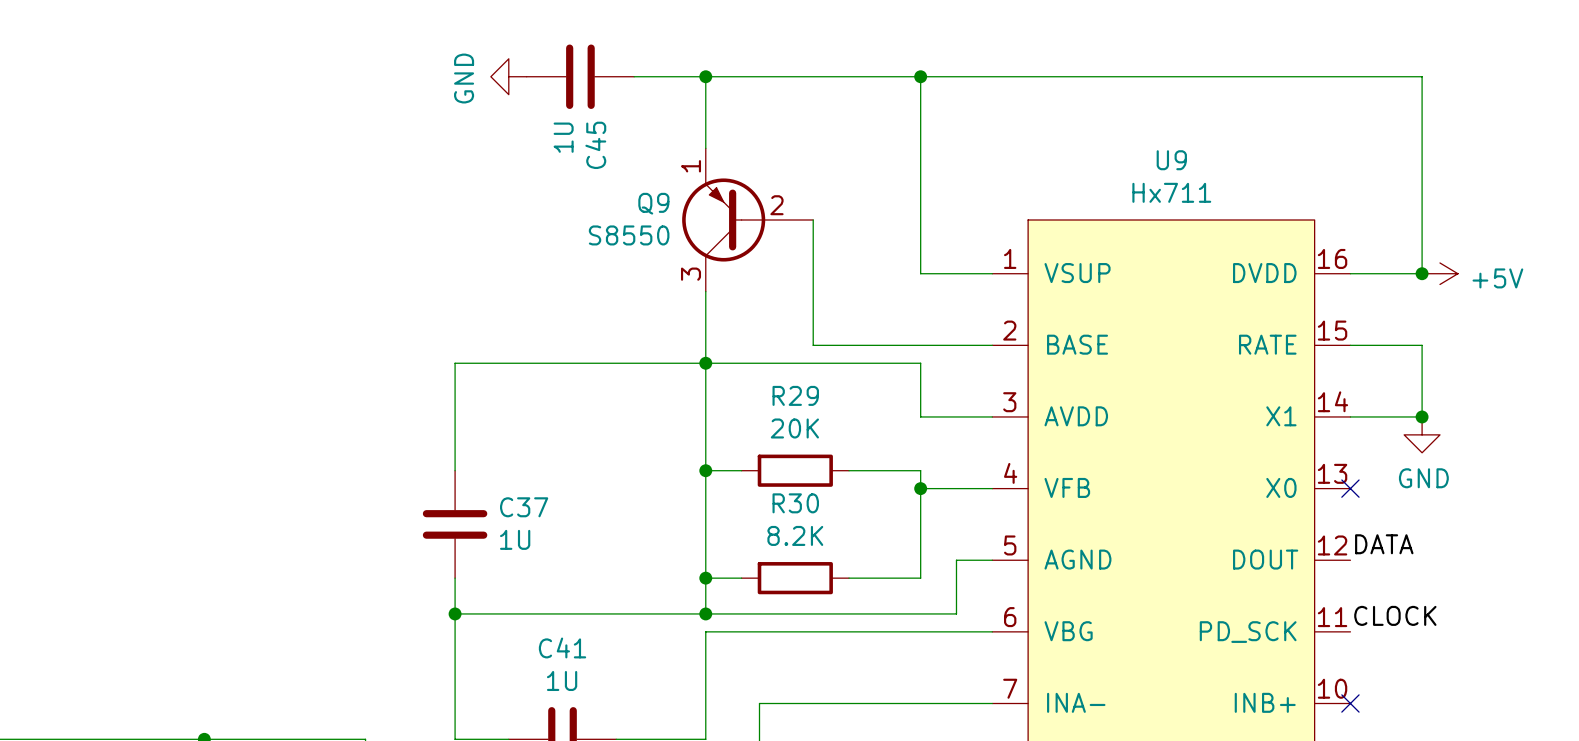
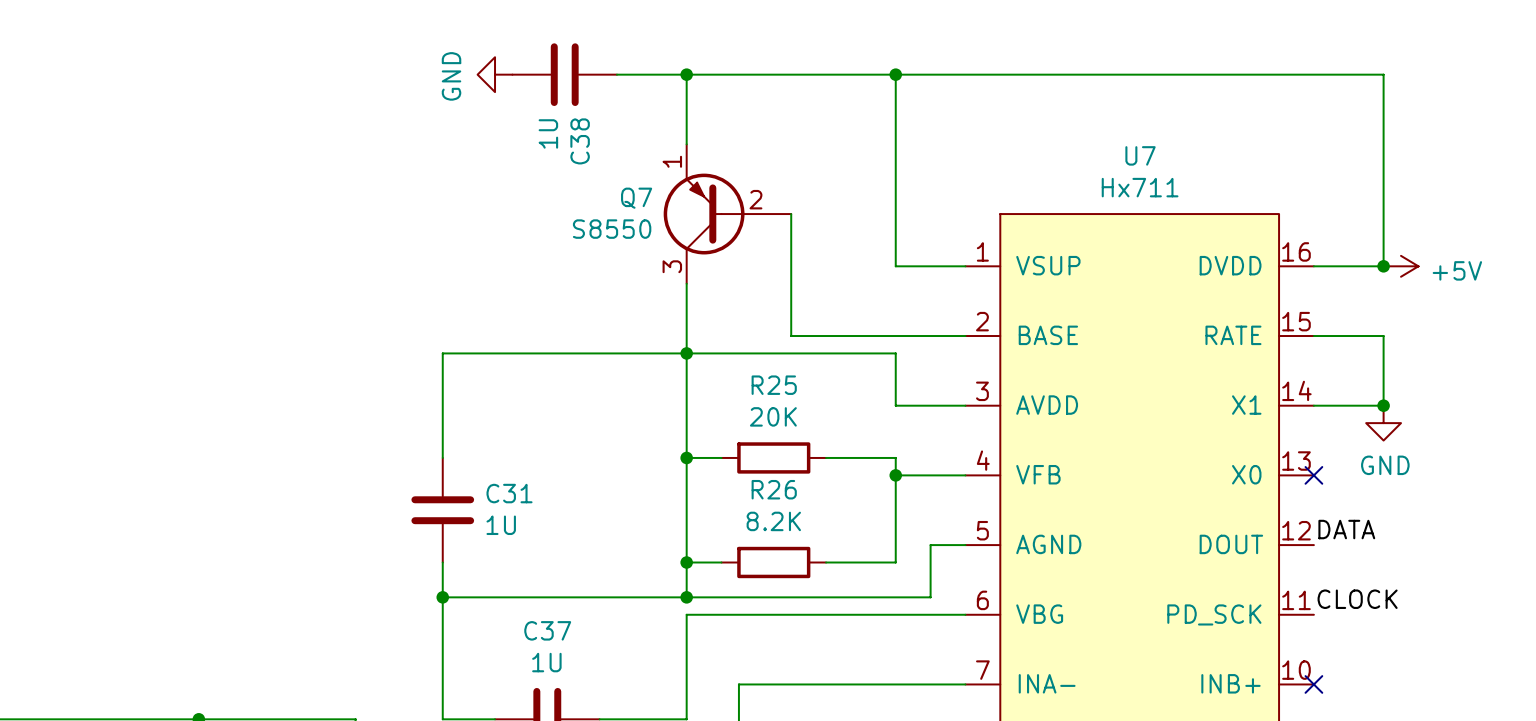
C45 name: C45 (595, 145) -> C38 (580, 141)
U9 name: U9 (1171, 160) -> U7 (1140, 155)
Q9 name: Q9 (653, 203) -> Q7 (636, 198)
R29 name: R29 (795, 395) -> R25 (774, 385)
R30 name: R30 (795, 503) -> R26 (774, 489)
C37 name: C37 (524, 507) -> C31 (509, 493)
C41 name: C41 (562, 647) -> C37 (547, 630)

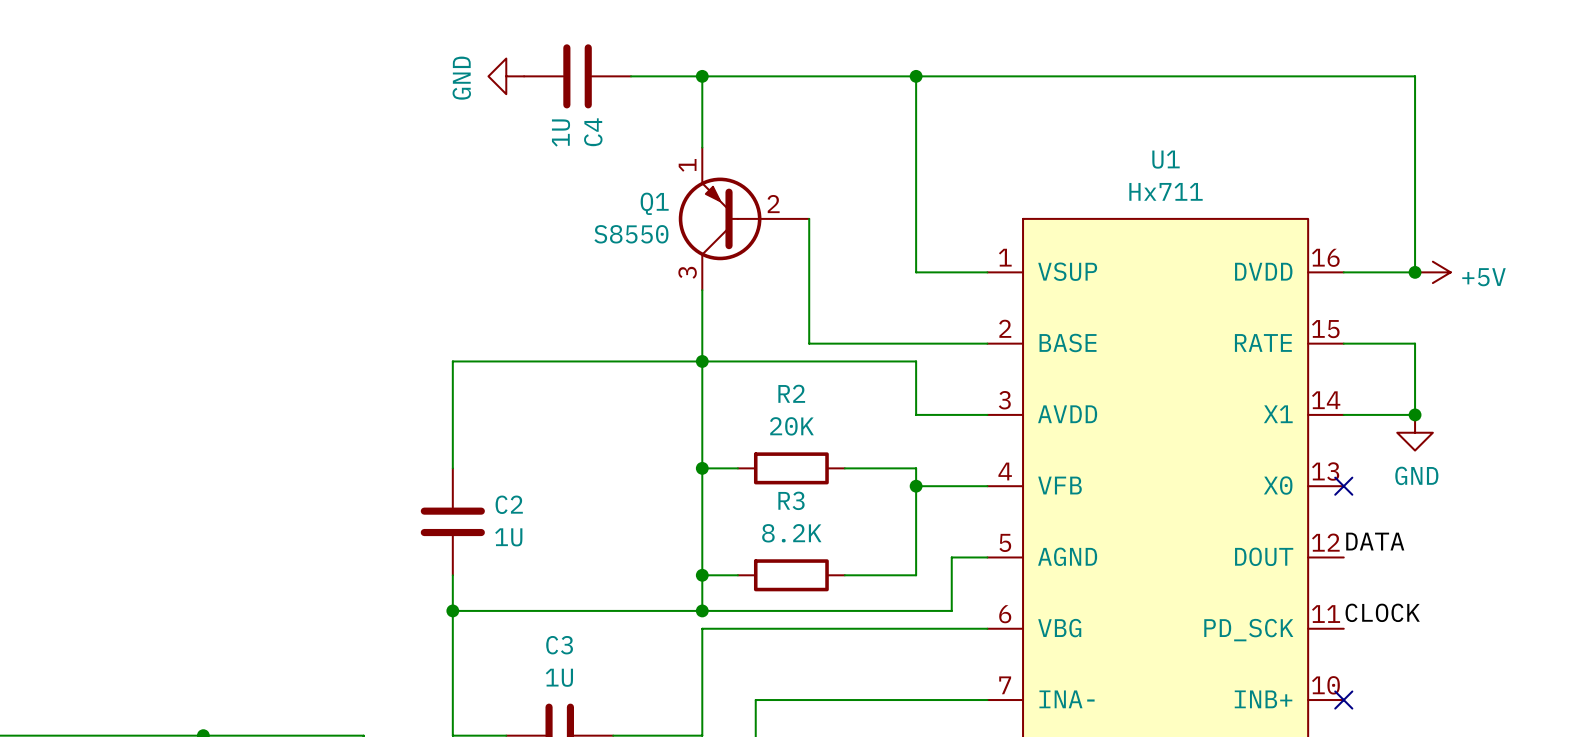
C38 name: C38 (580, 141) -> C4 (593, 132)
U7 name: U7 (1140, 155) -> U1 (1166, 159)
Q7 name: Q7 (636, 198) -> Q1 (654, 203)
R25 name: R25 (774, 385) -> R2 (791, 393)
R26 name: R26 (774, 489) -> R3 (791, 500)
C31 name: C31 (509, 493) -> C2 (509, 504)
C37 name: C37 (547, 630) -> C3 (559, 645)

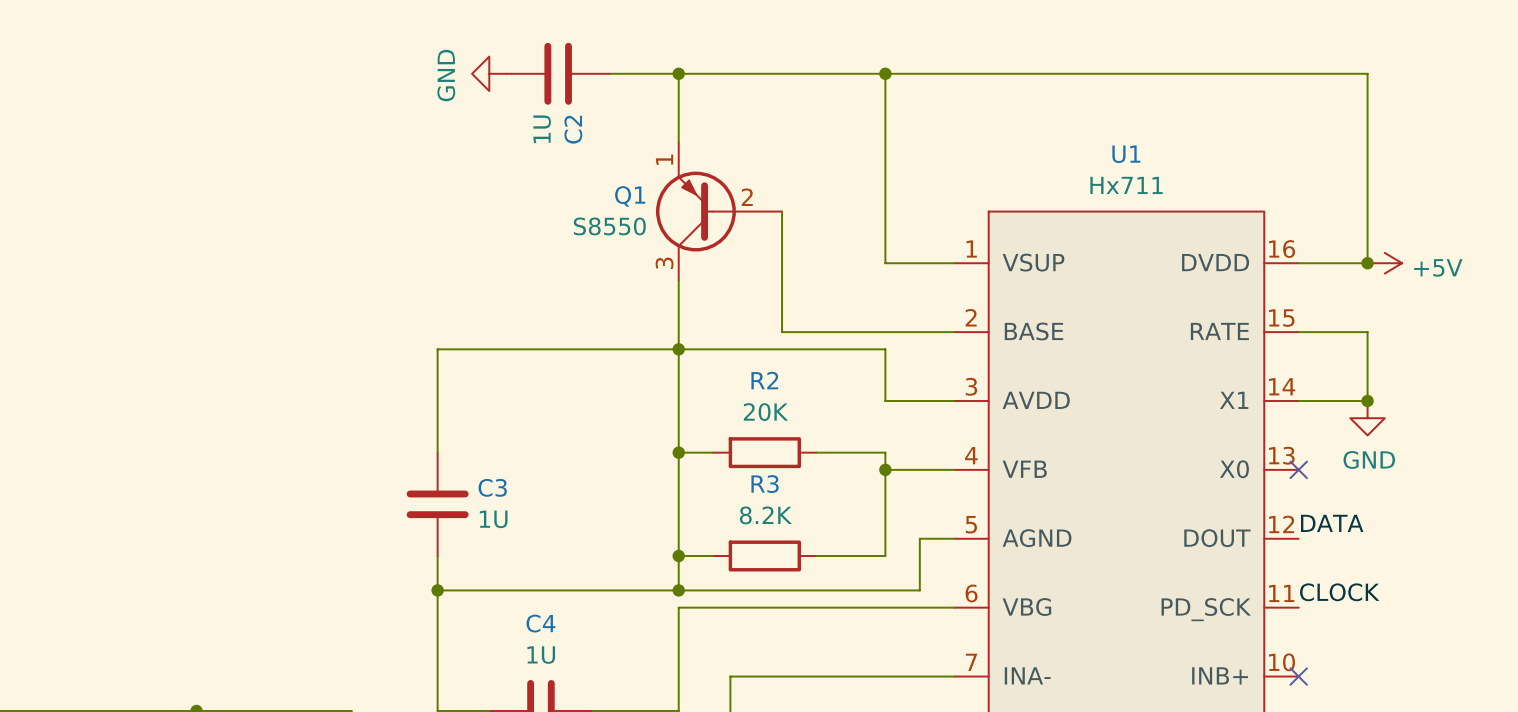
C4 name: C4 (593, 132) -> C2 (573, 129)
C2 name: C2 (509, 504) -> C3 (492, 487)
C3 name: C3 (559, 645) -> C4 (540, 623)

